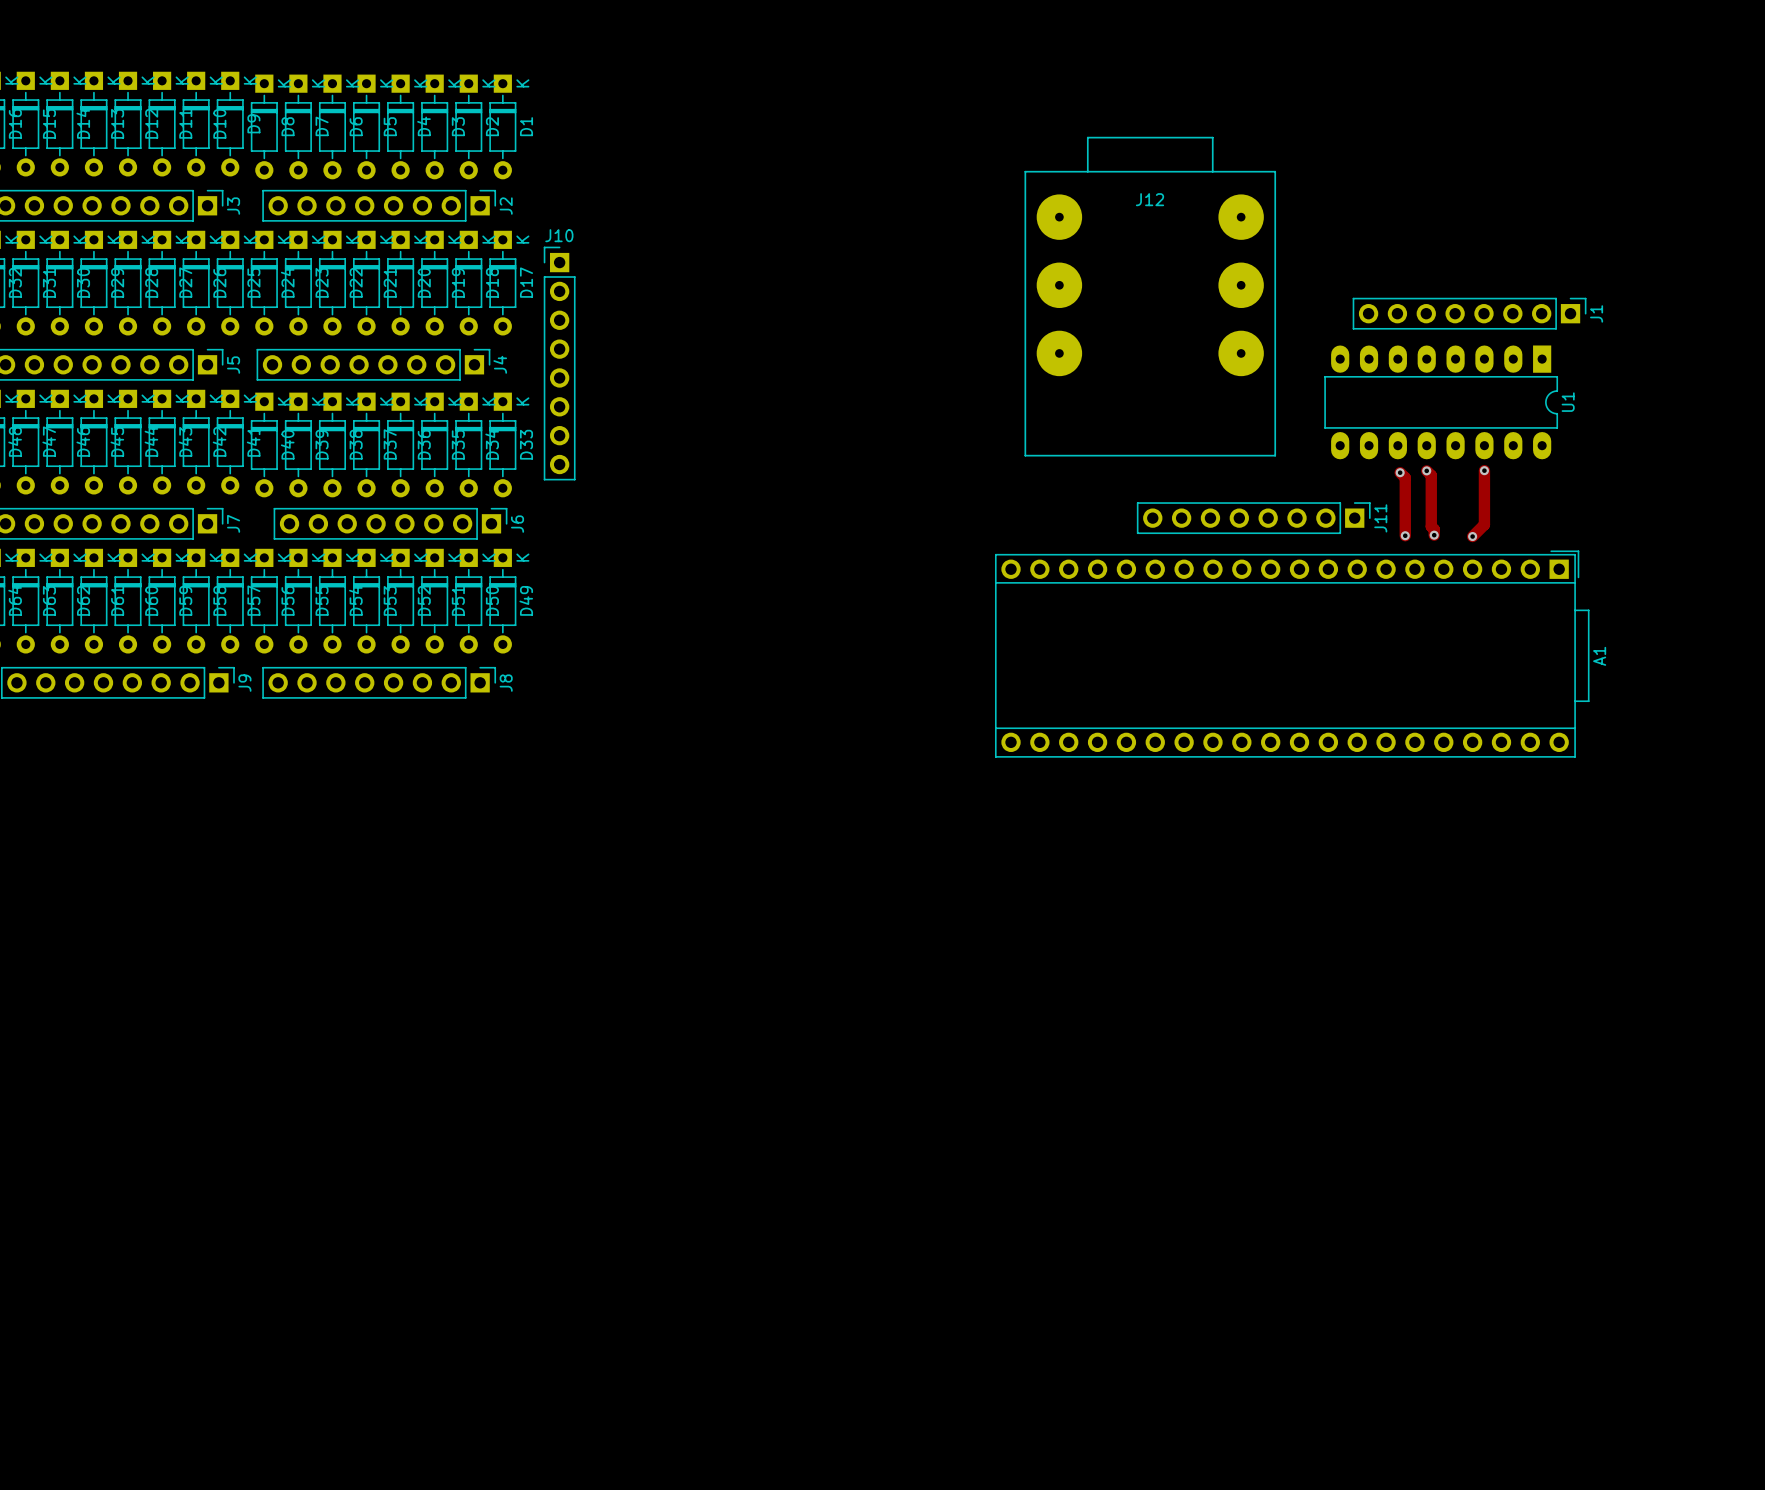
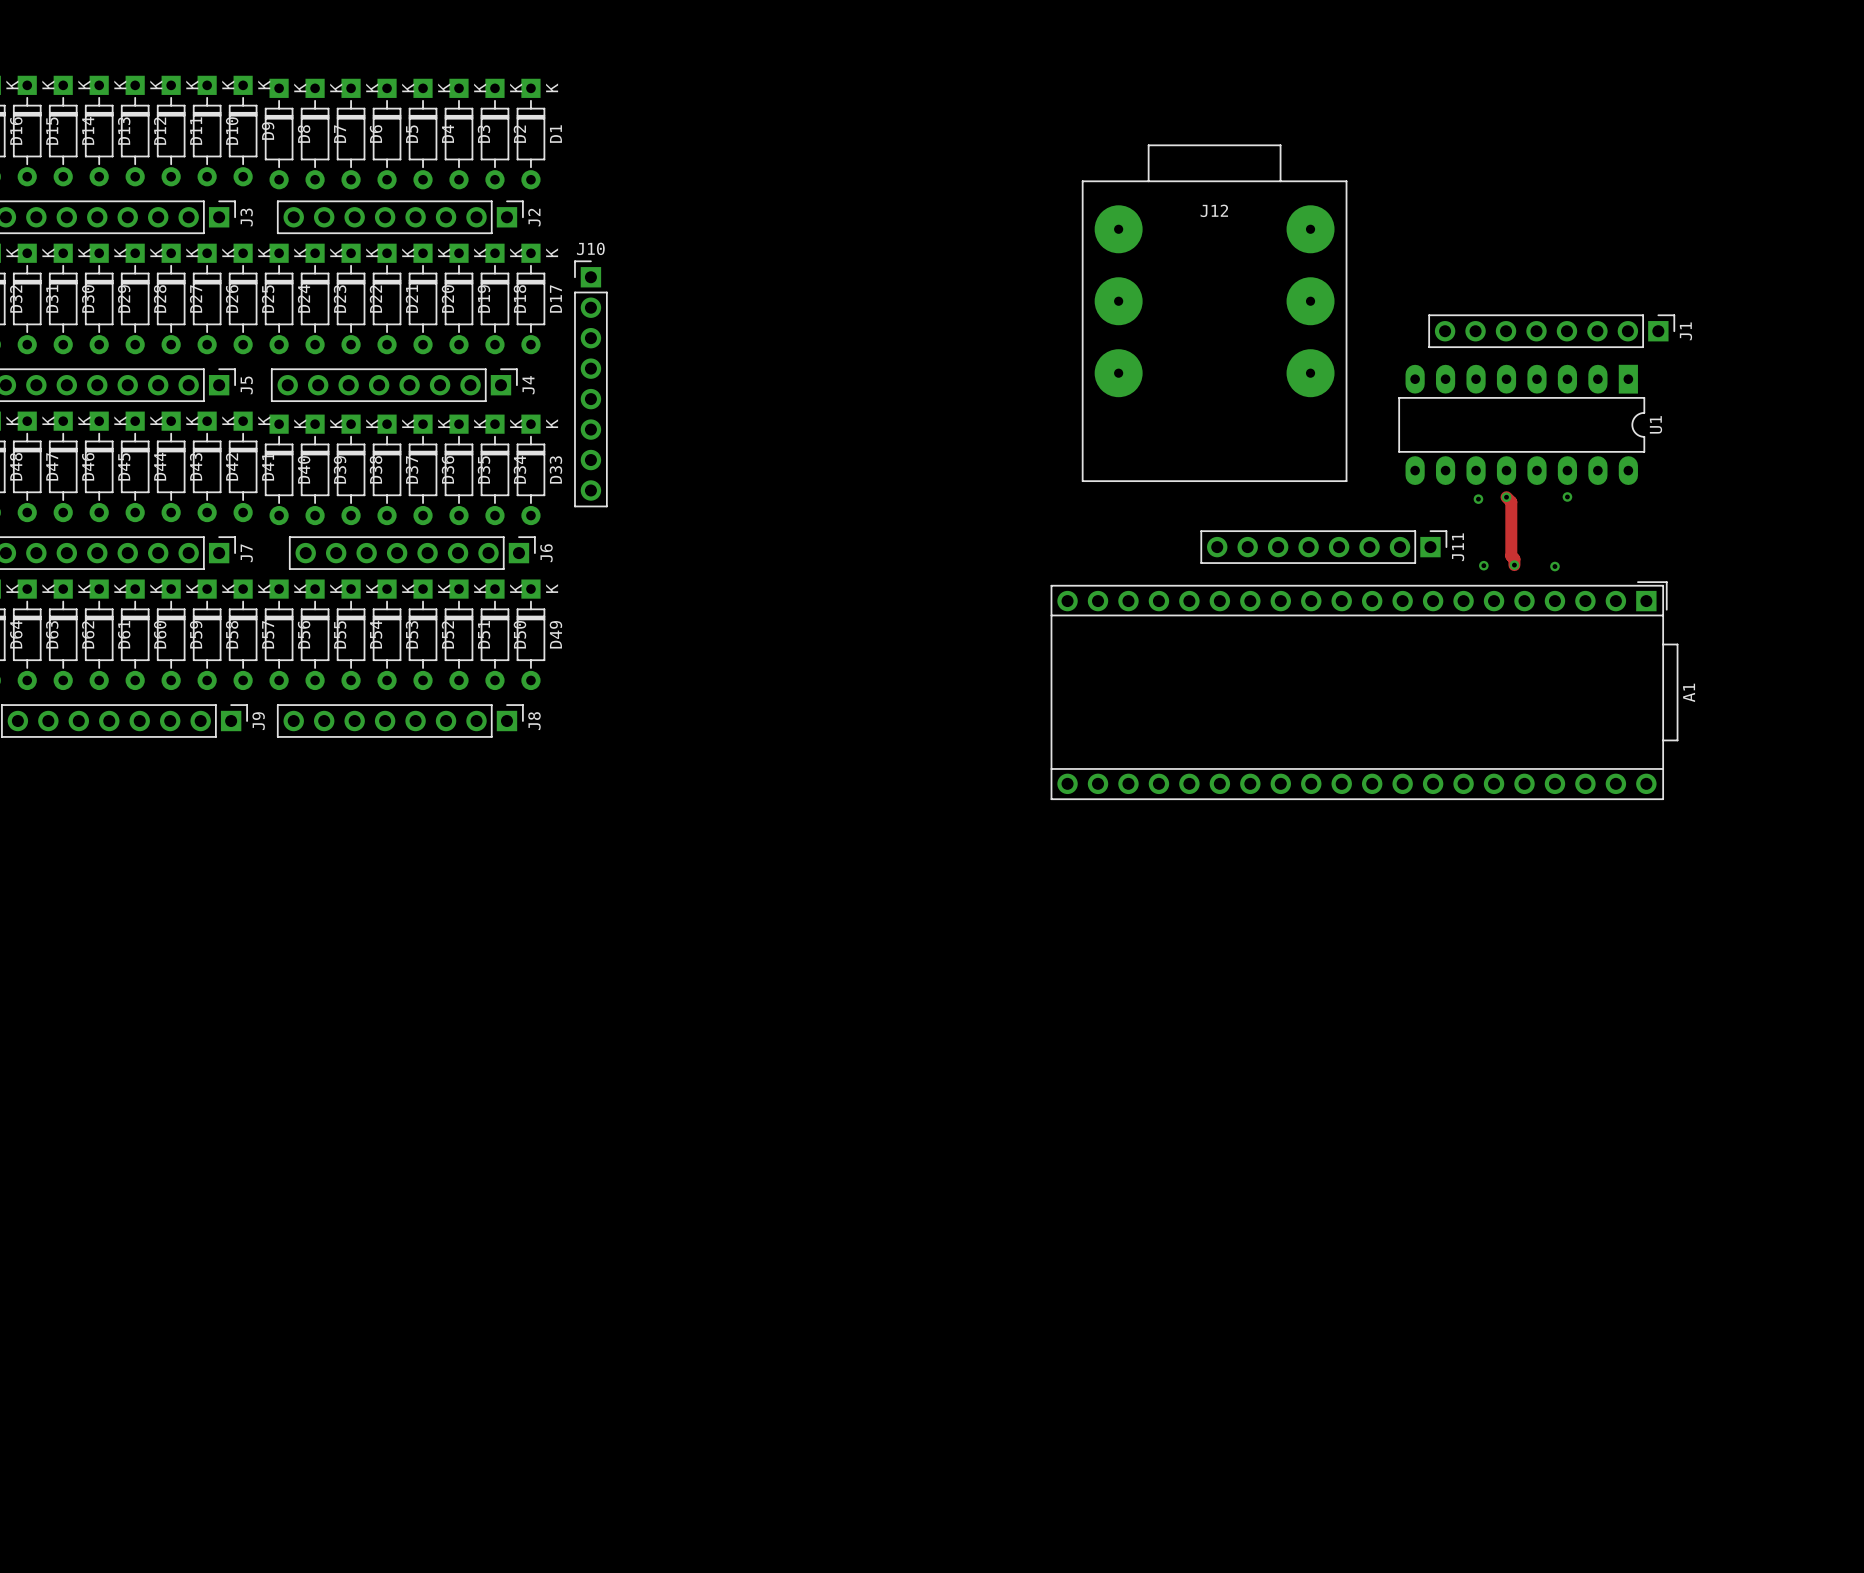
track: (1484, 470) (1484, 524) (1472, 536) -> none
track: (1400, 472) (1405, 477) (1405, 535) -> none

